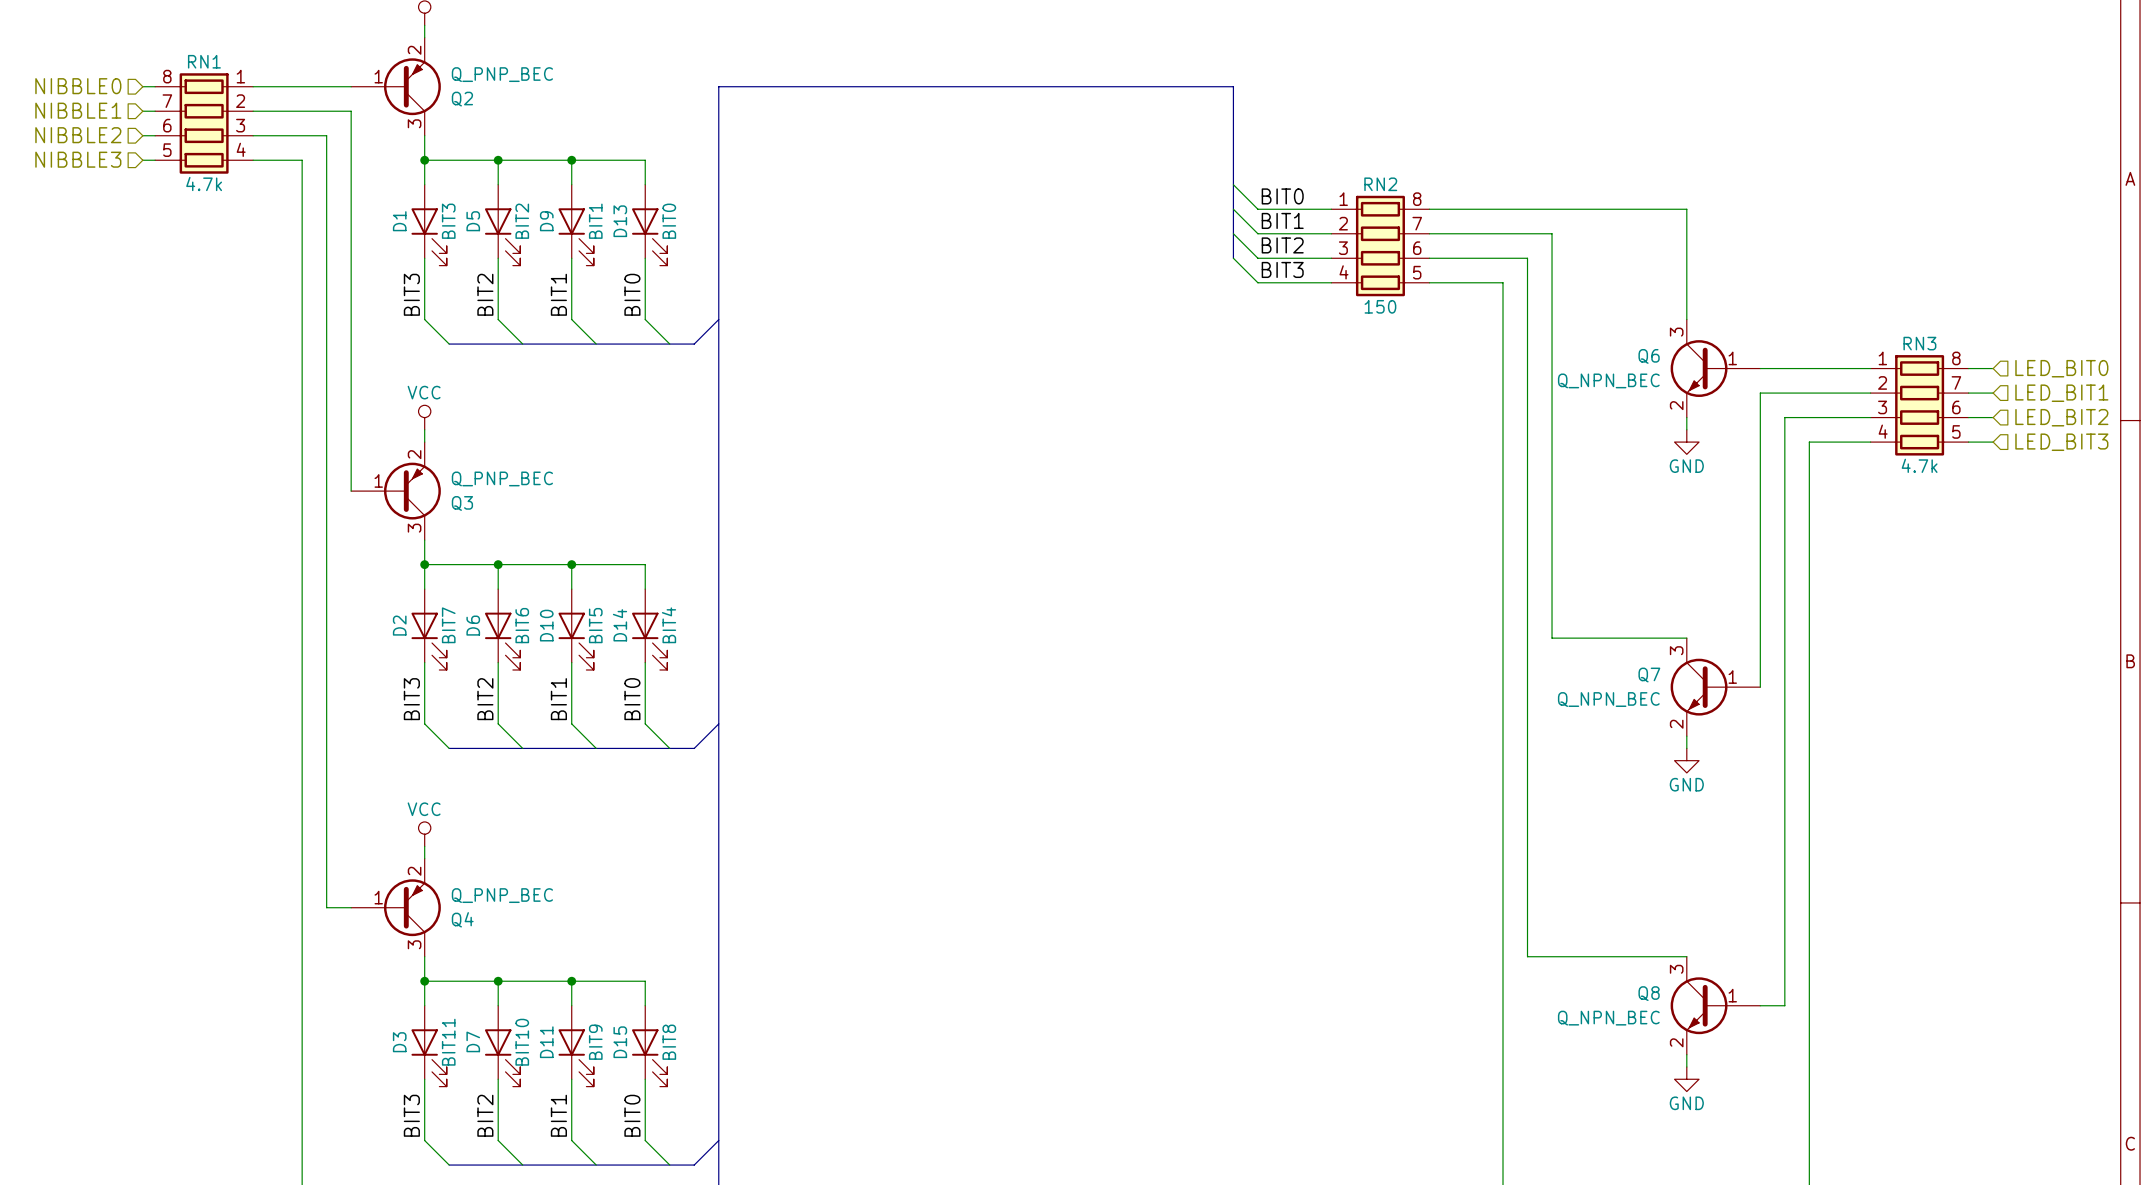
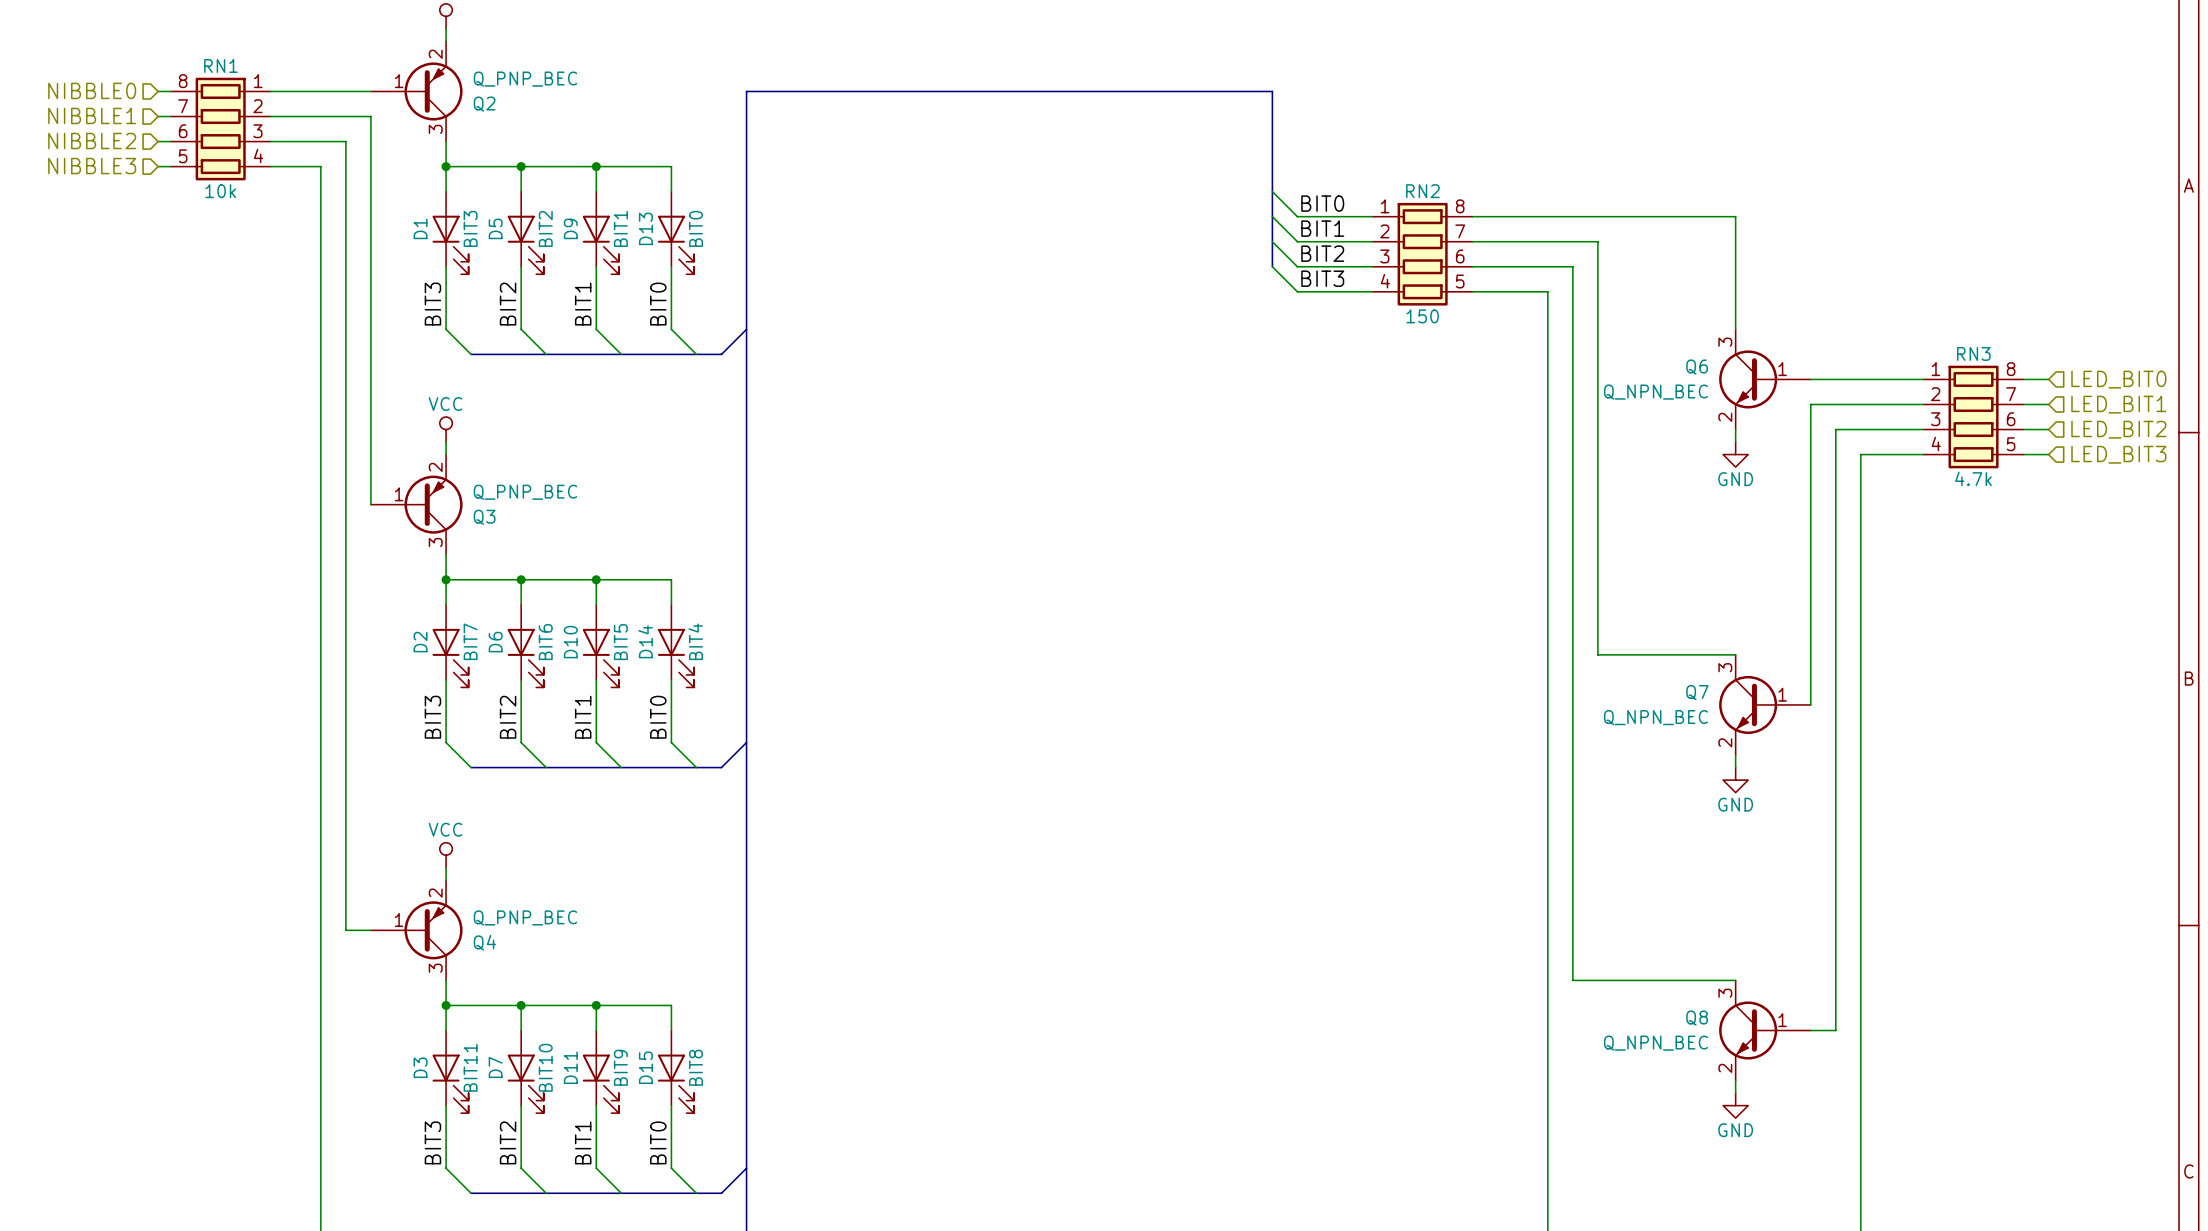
RN1 value: 4.7k (204, 184) -> 10k (220, 191)

